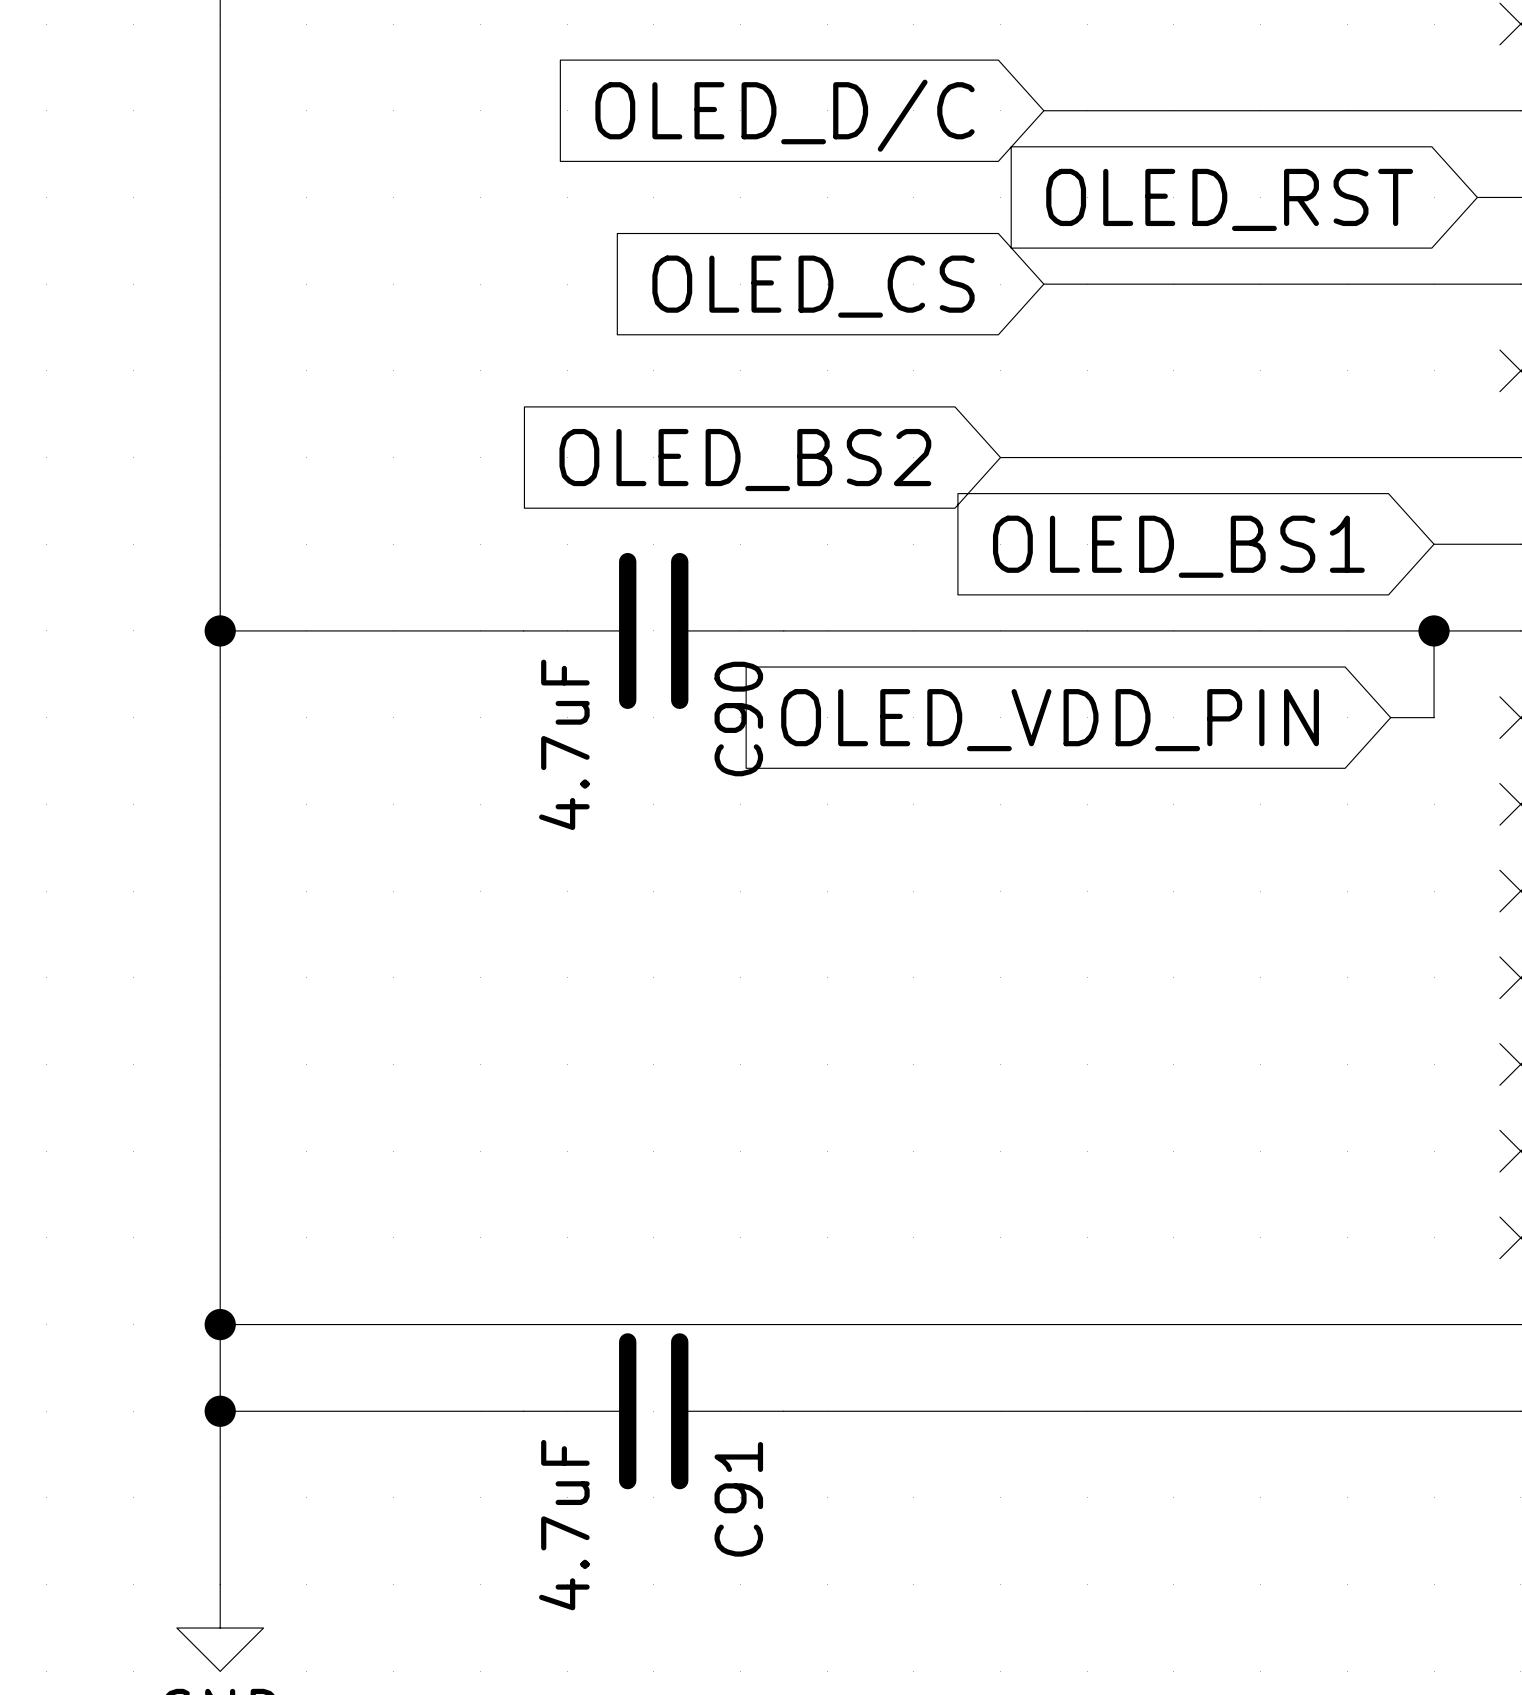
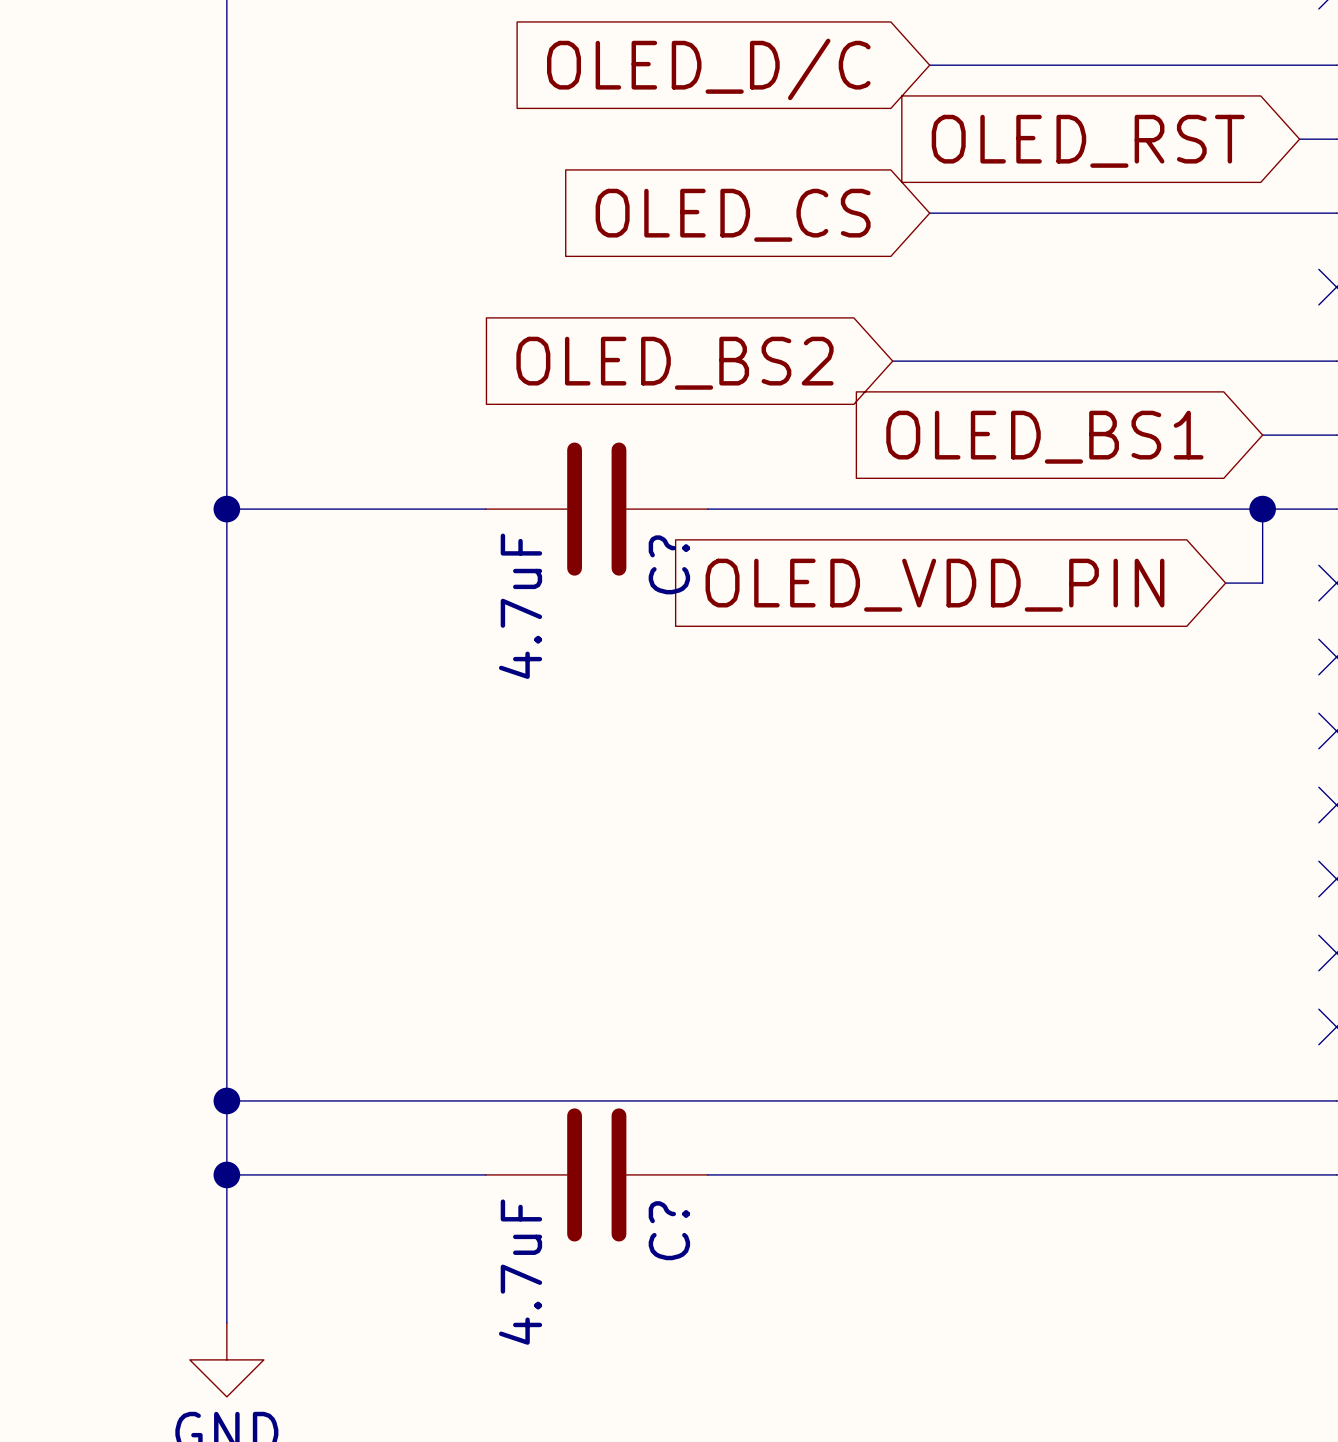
C90 name: C90 (738, 719) -> C? (669, 564)
C91 name: C91 (738, 1499) -> C? (669, 1230)

